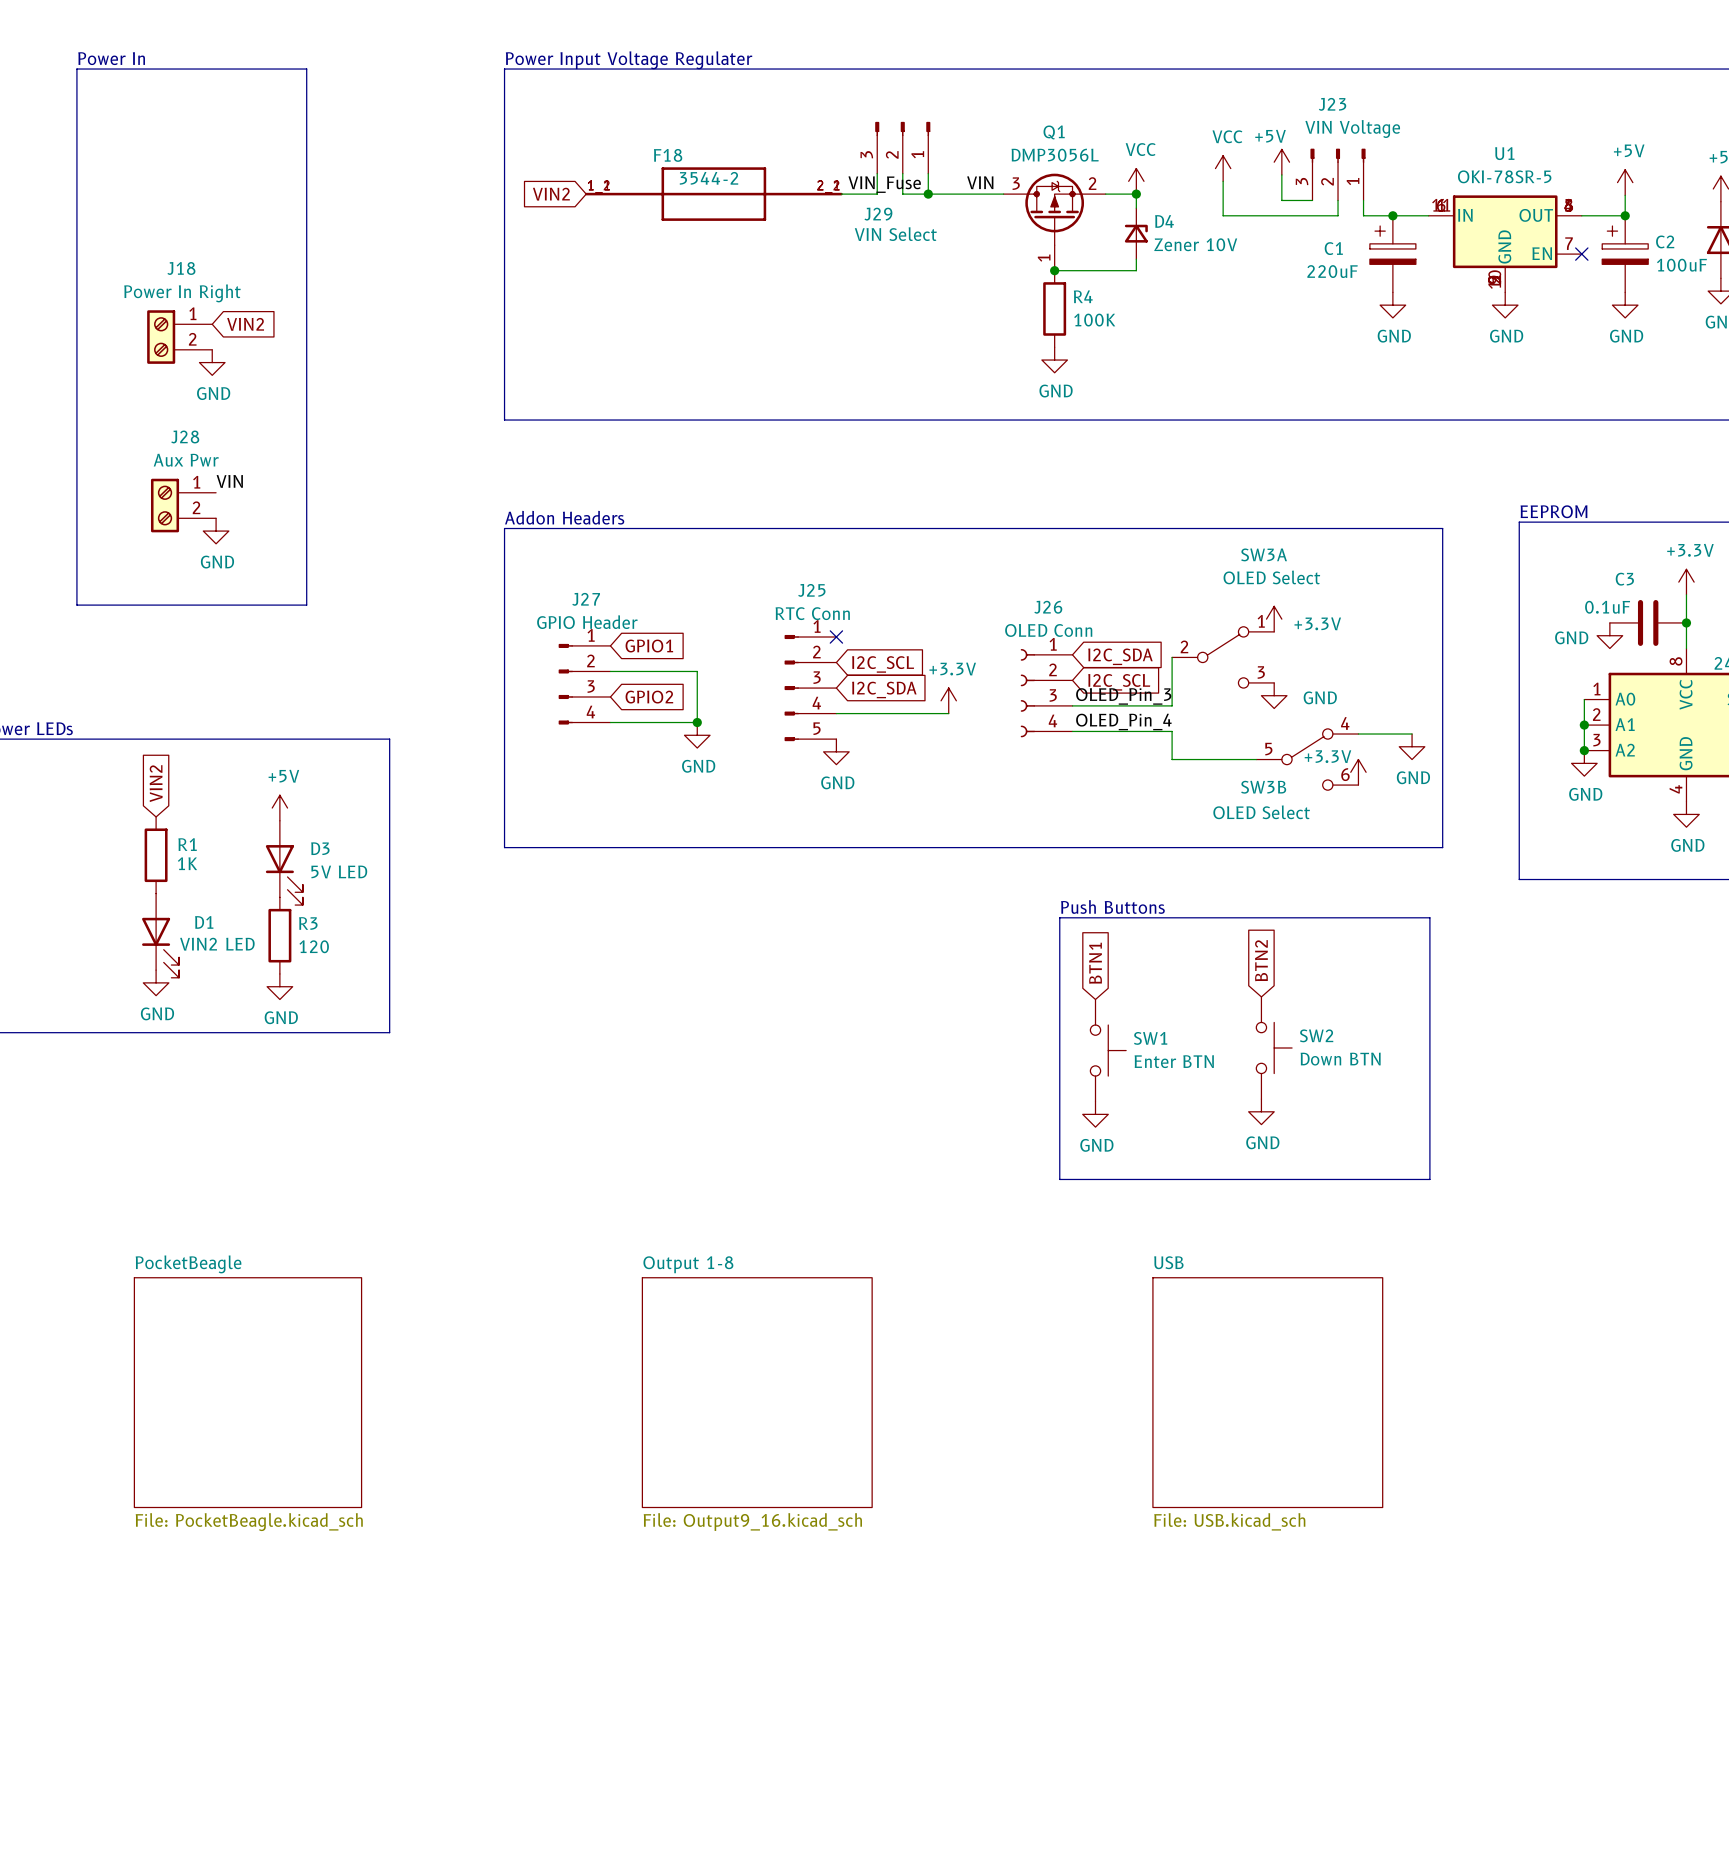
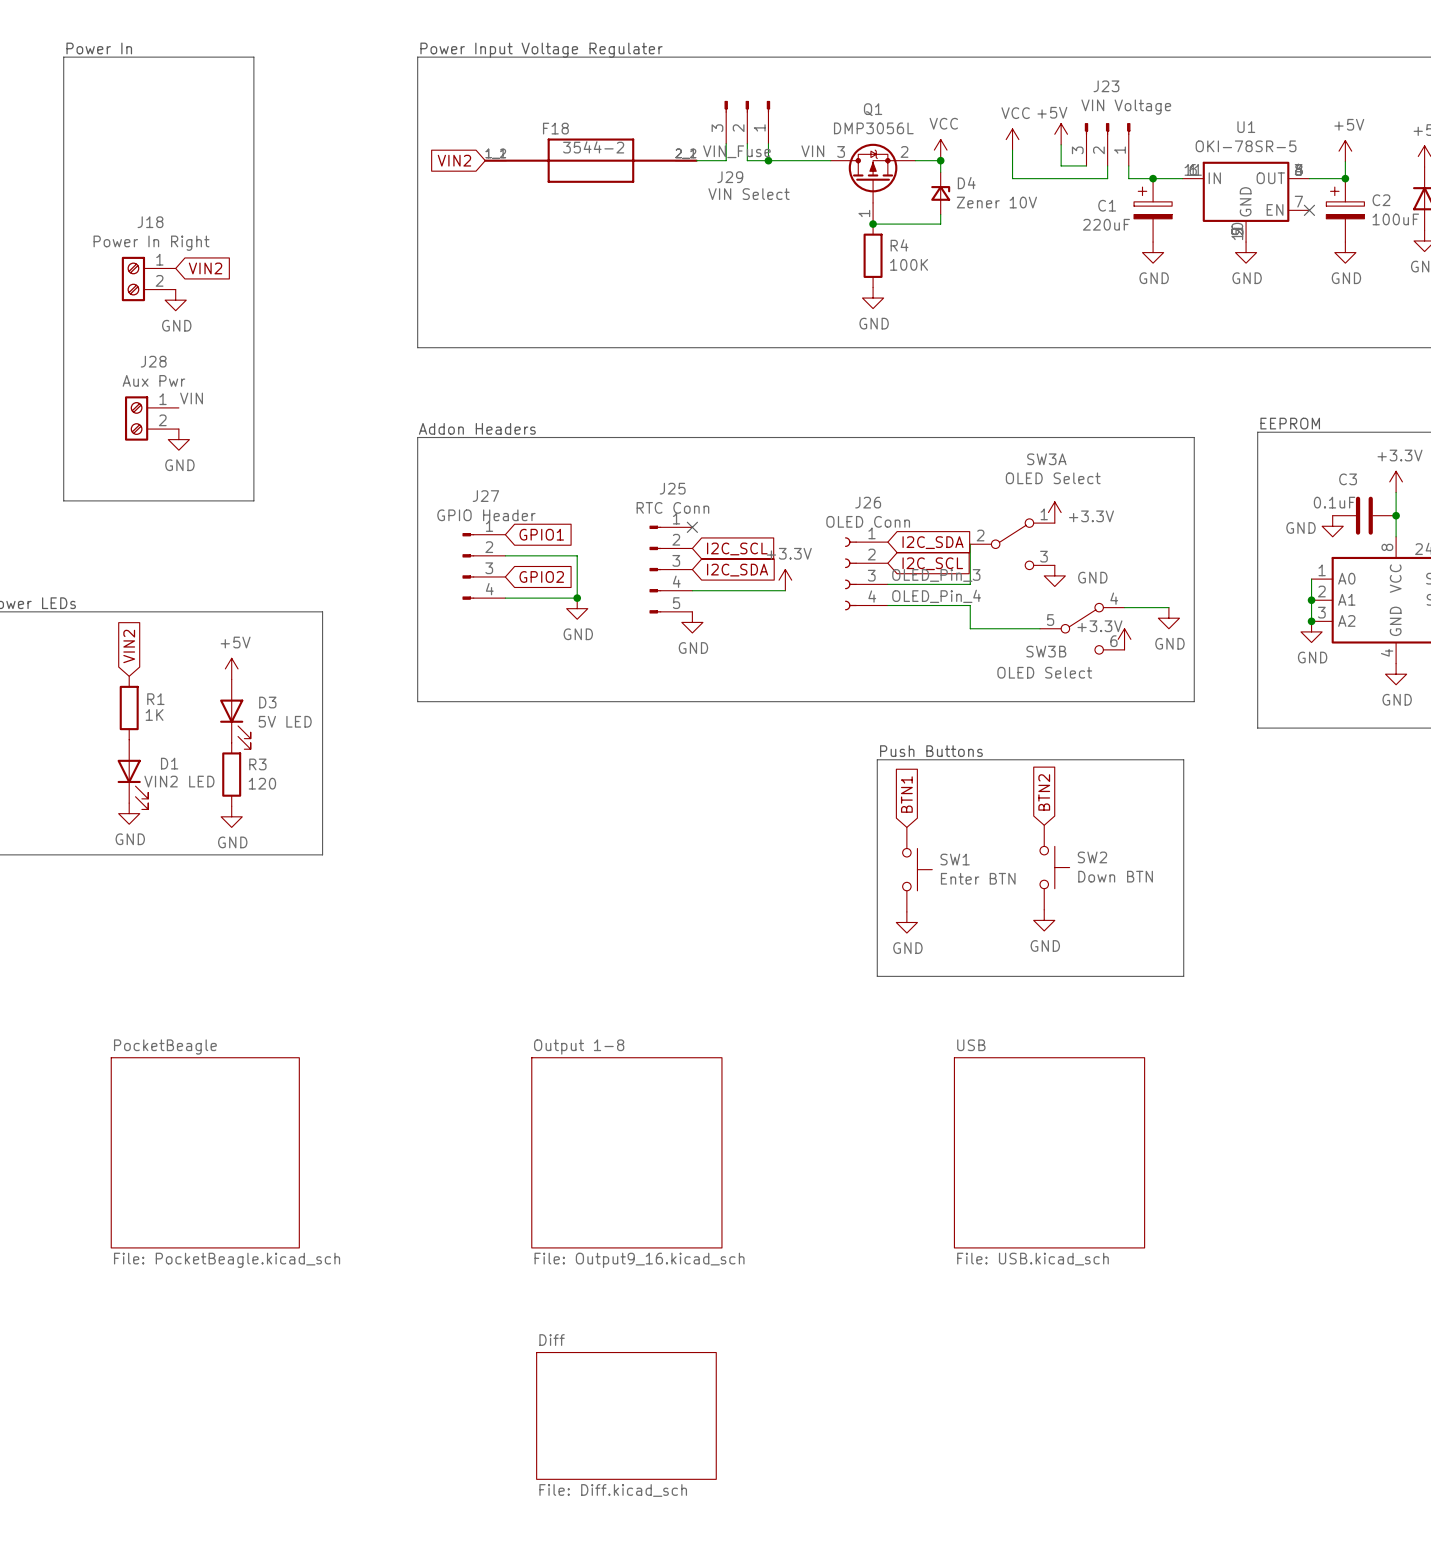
sheet Diff: none -> File: Diff.kicad_sch (626, 1415)

